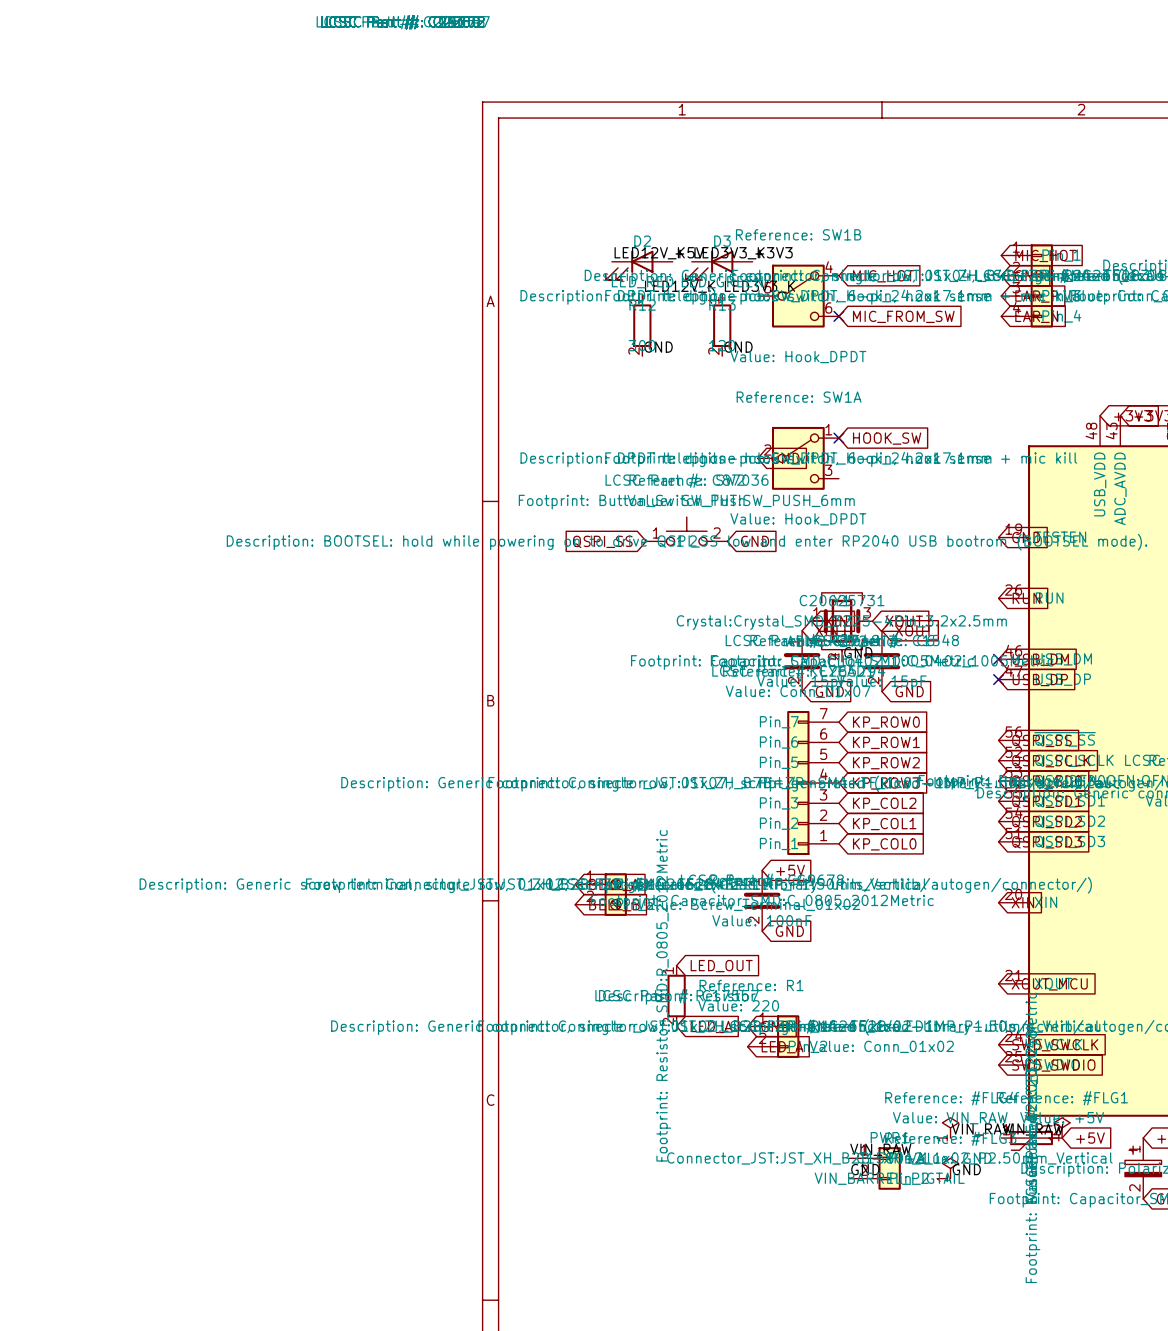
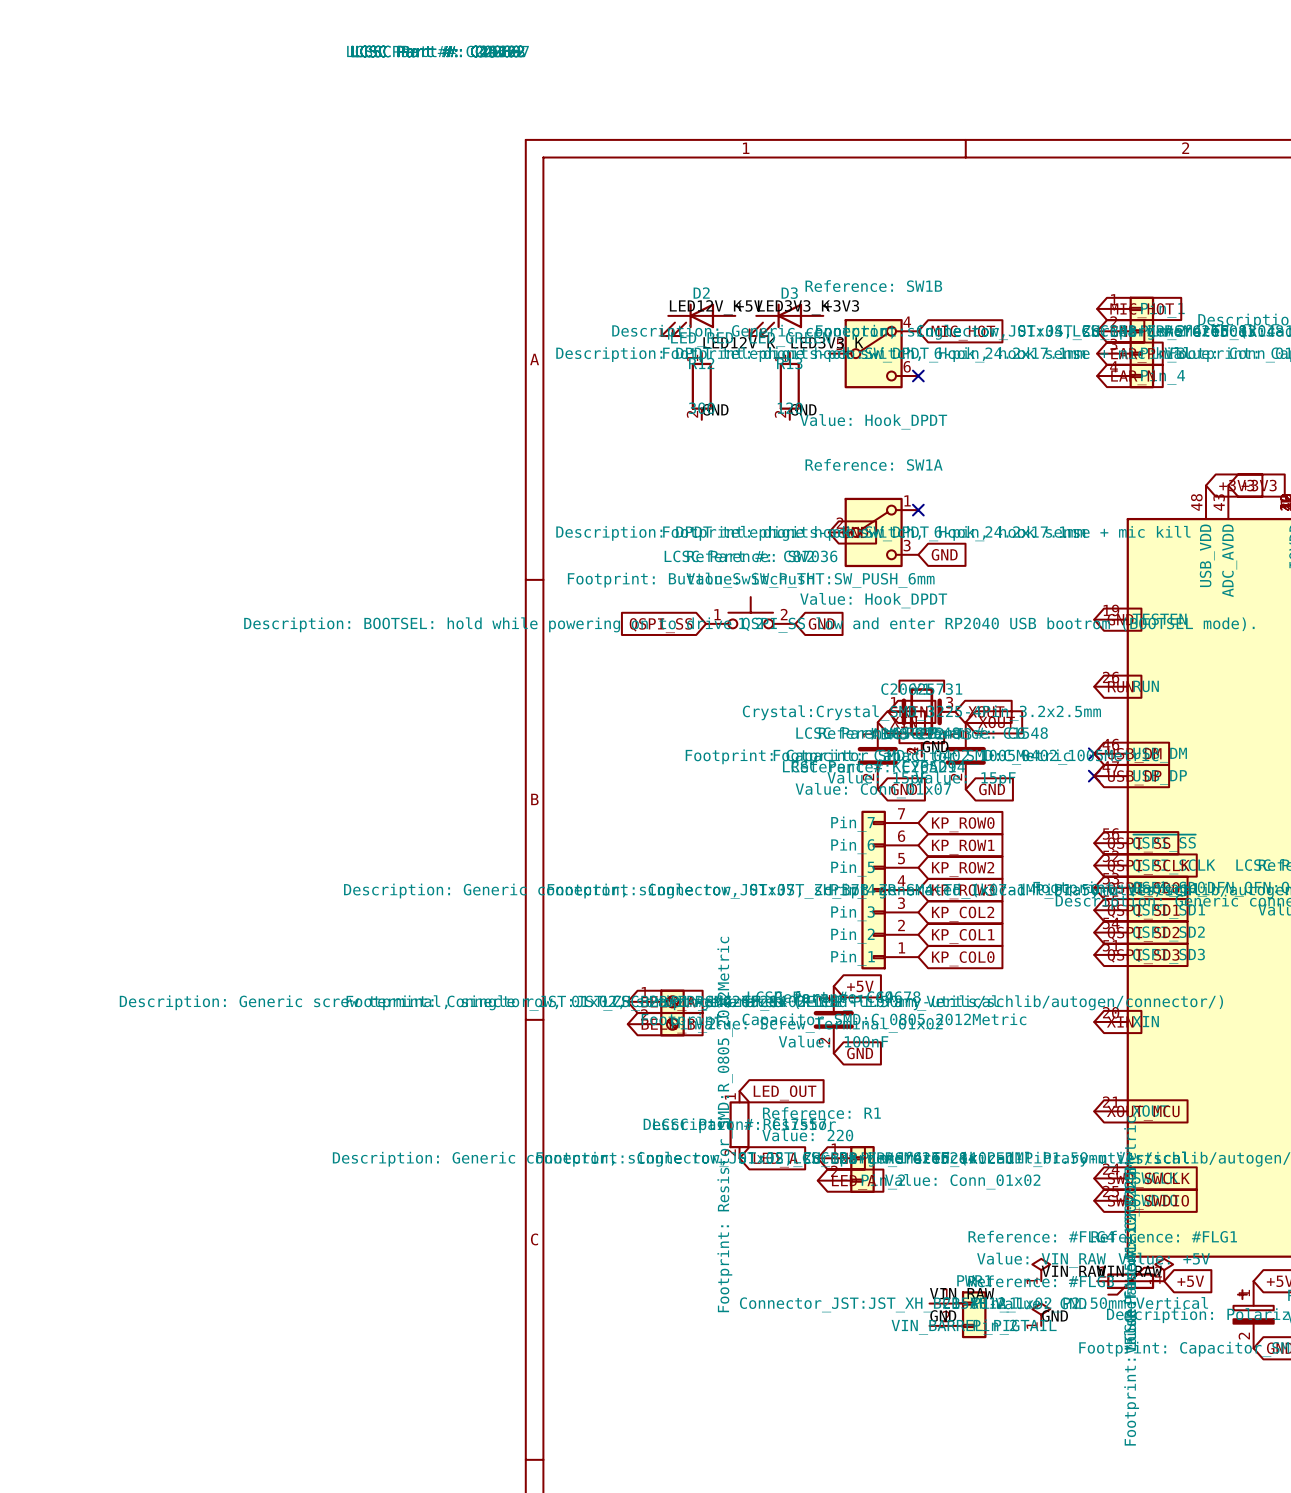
global label: MIC_FROM_SW (903, 316) -> none
global label: HOOK_SW (887, 438) -> none
global label: none -> GND (944, 554)

